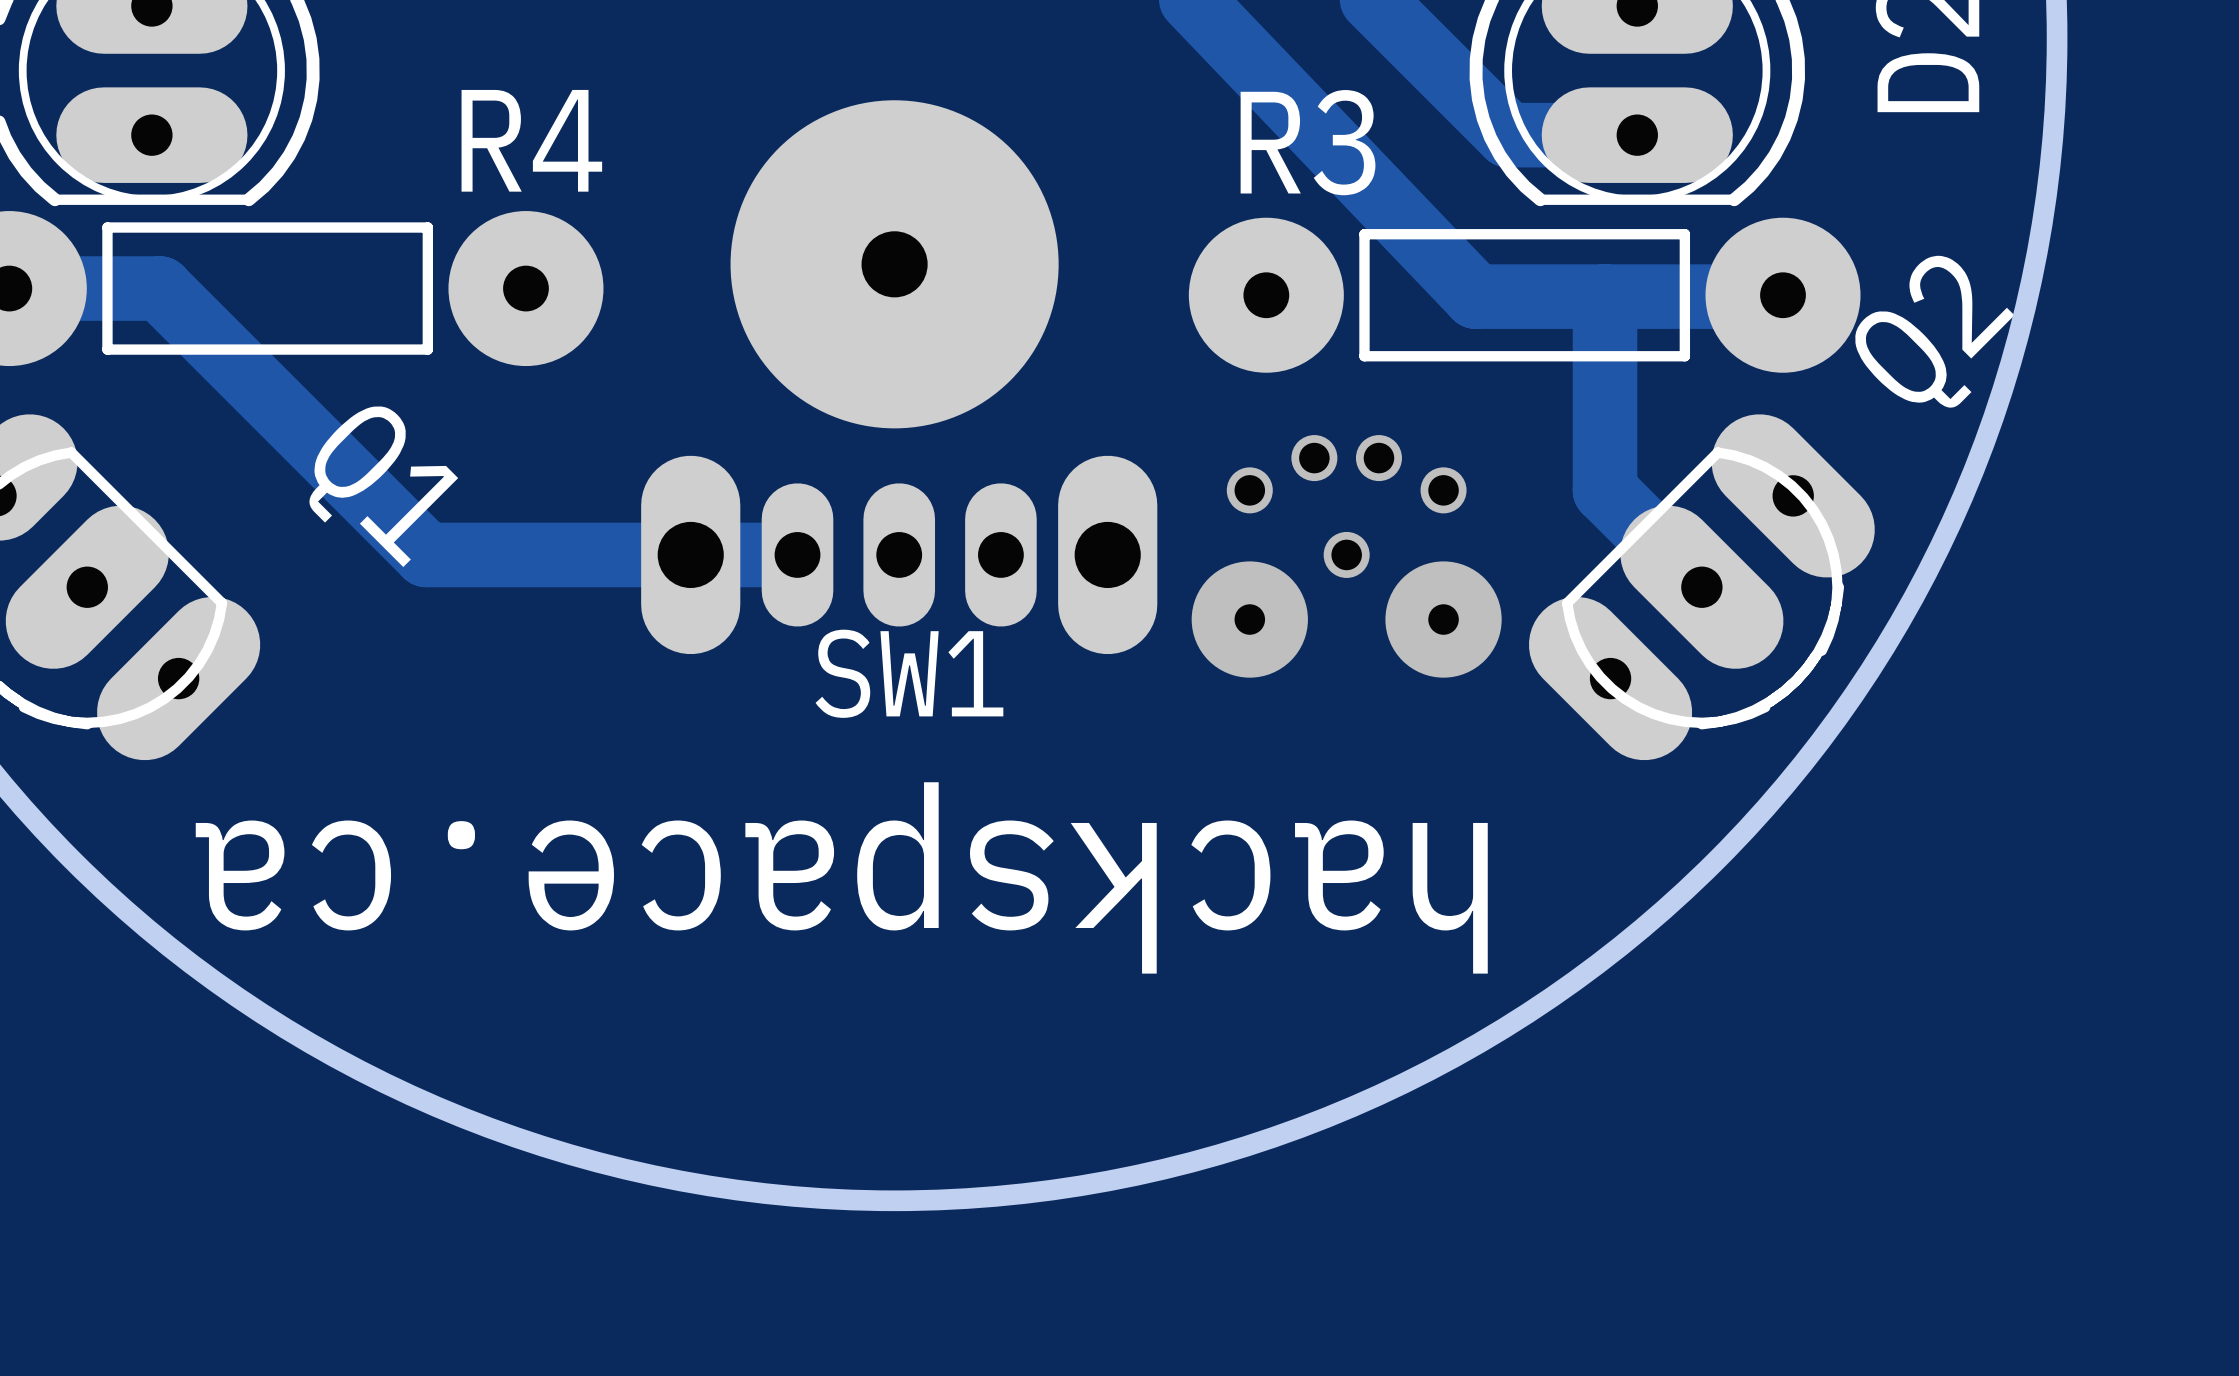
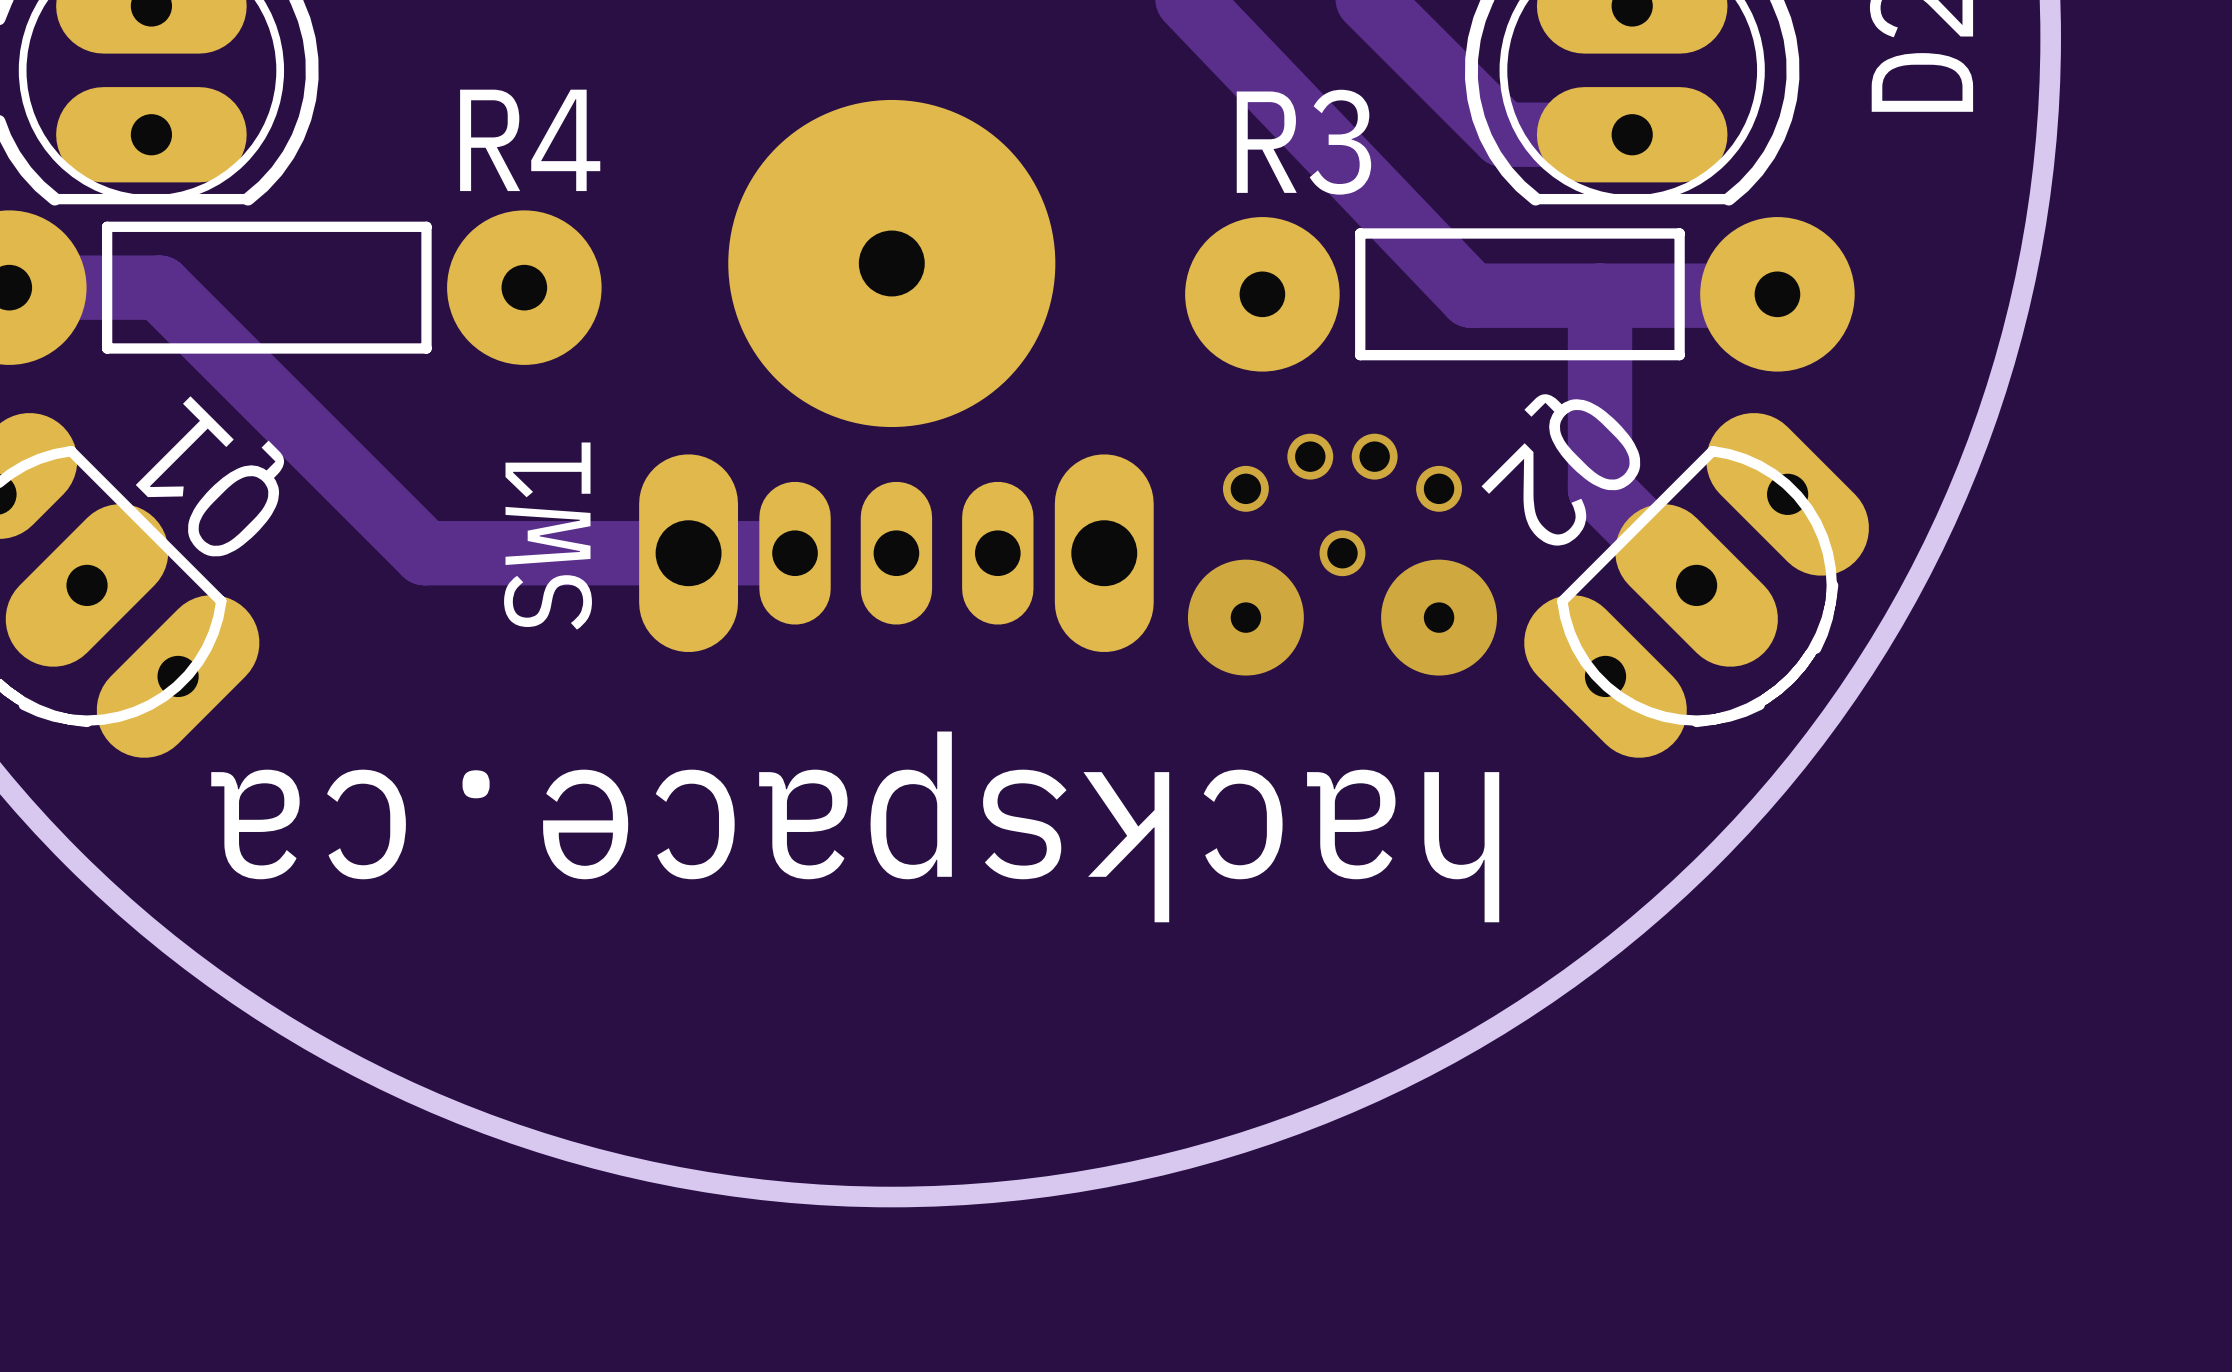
Q2 name rotation: 0° (1934, 332) -> 180° (1561, 469)
Q2 name position: Q2 (1934, 332) -> Q2 (1561, 469)
Q1 name rotation: 0° (383, 486) -> 180° (210, 476)
SW1 name rotation: 0° (909, 673) -> 90° counterclockwise (548, 536)
SW1 name position: SW1 (909, 673) -> SW1 (548, 536)
text position: hackspace.ca (841, 877) -> hackspace.ca (855, 826)

